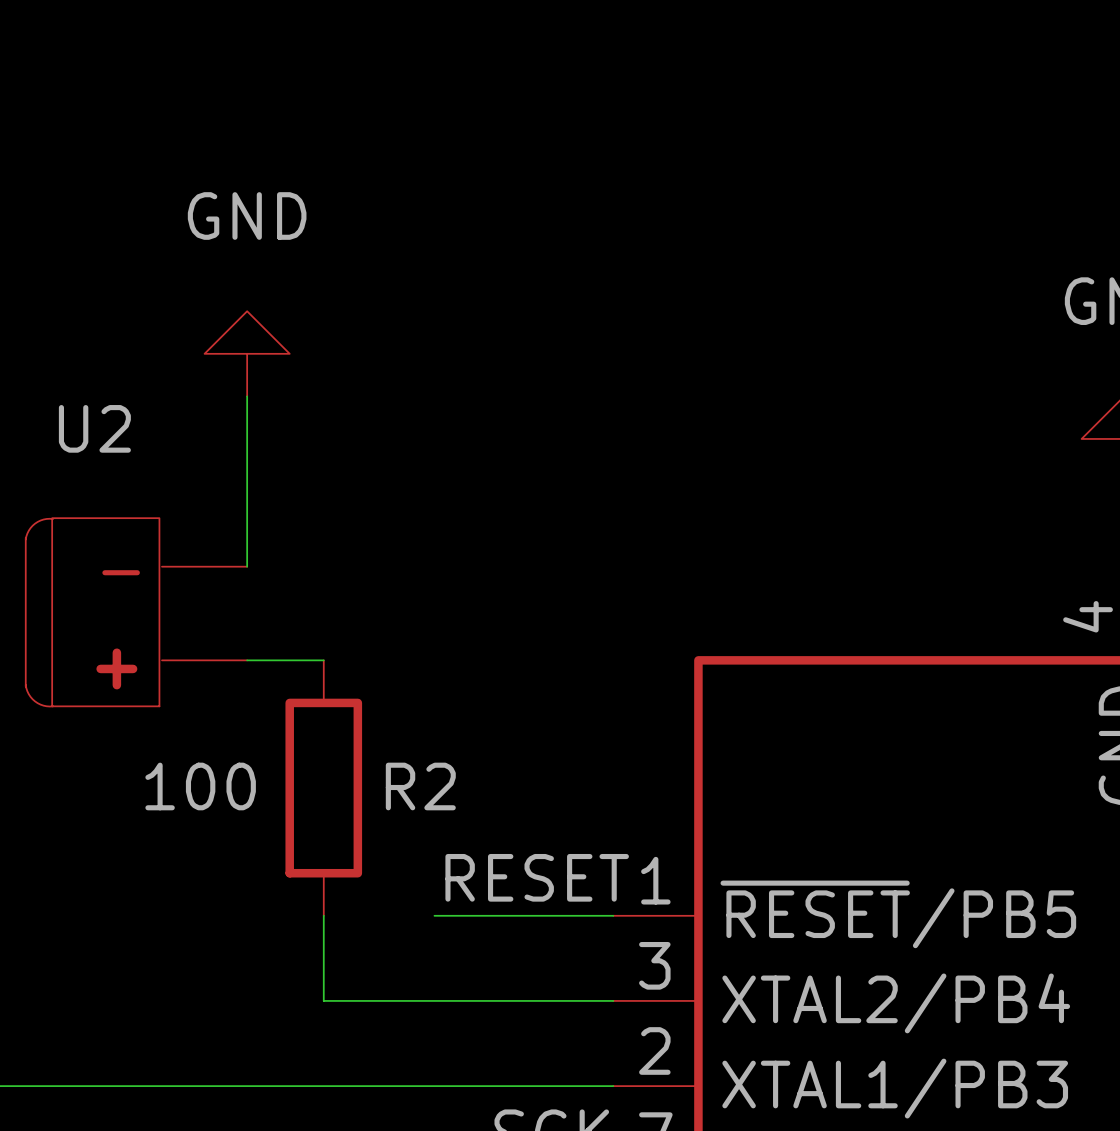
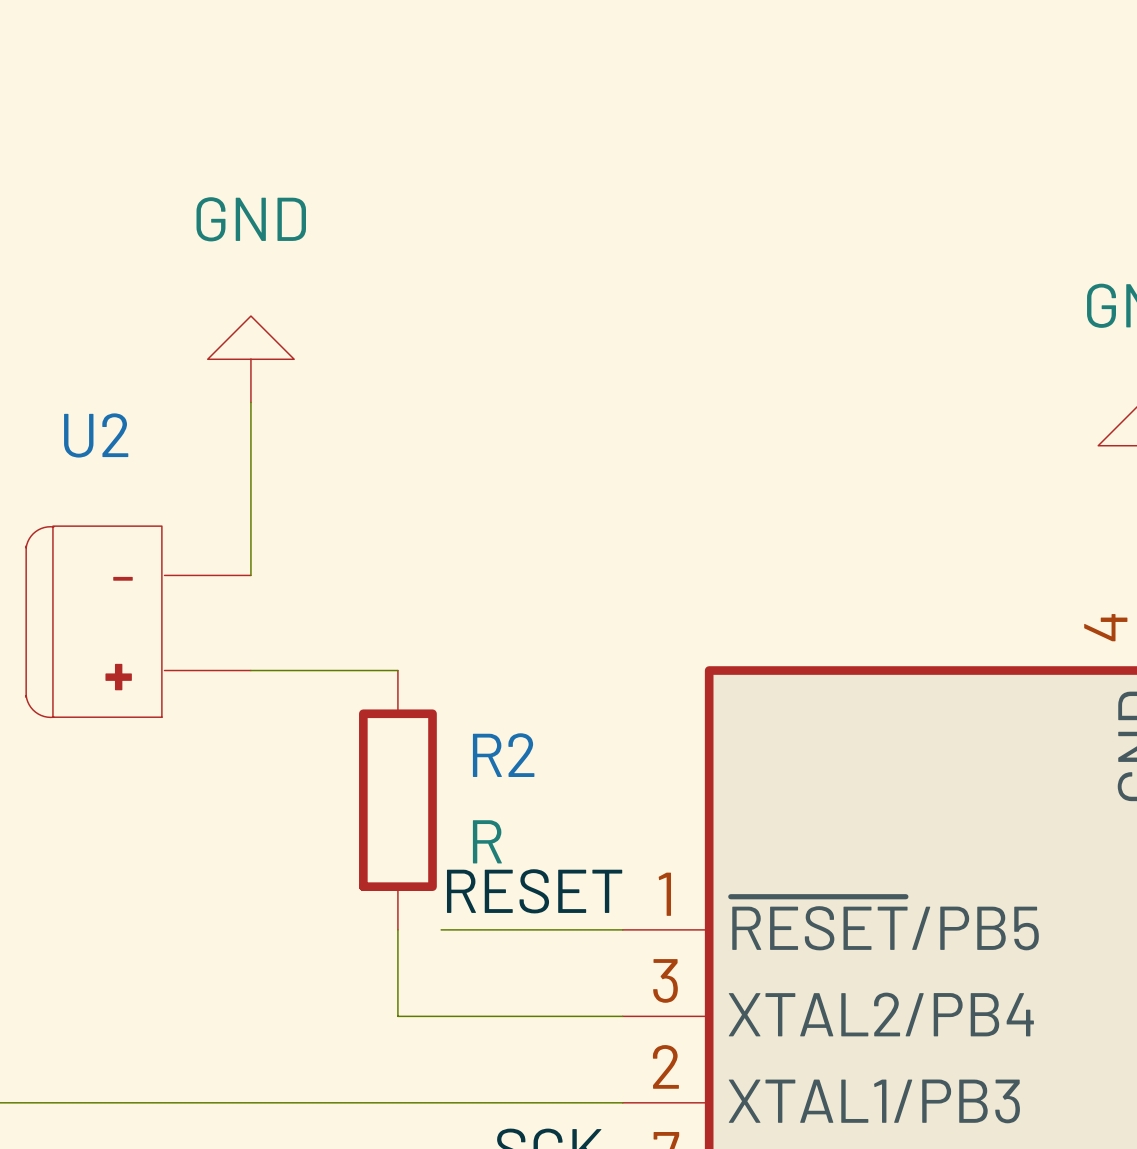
wire: none -> (328, 670) (397, 670)
R2 value: 100 (200, 786) -> R (487, 841)
R2 name position: R2 (420, 786) -> R2 (503, 755)
R2 position: (323, 788) -> (397, 800)
wire: (323, 915) (323, 1000) (391, 1000) -> (397, 929) (397, 1016)

